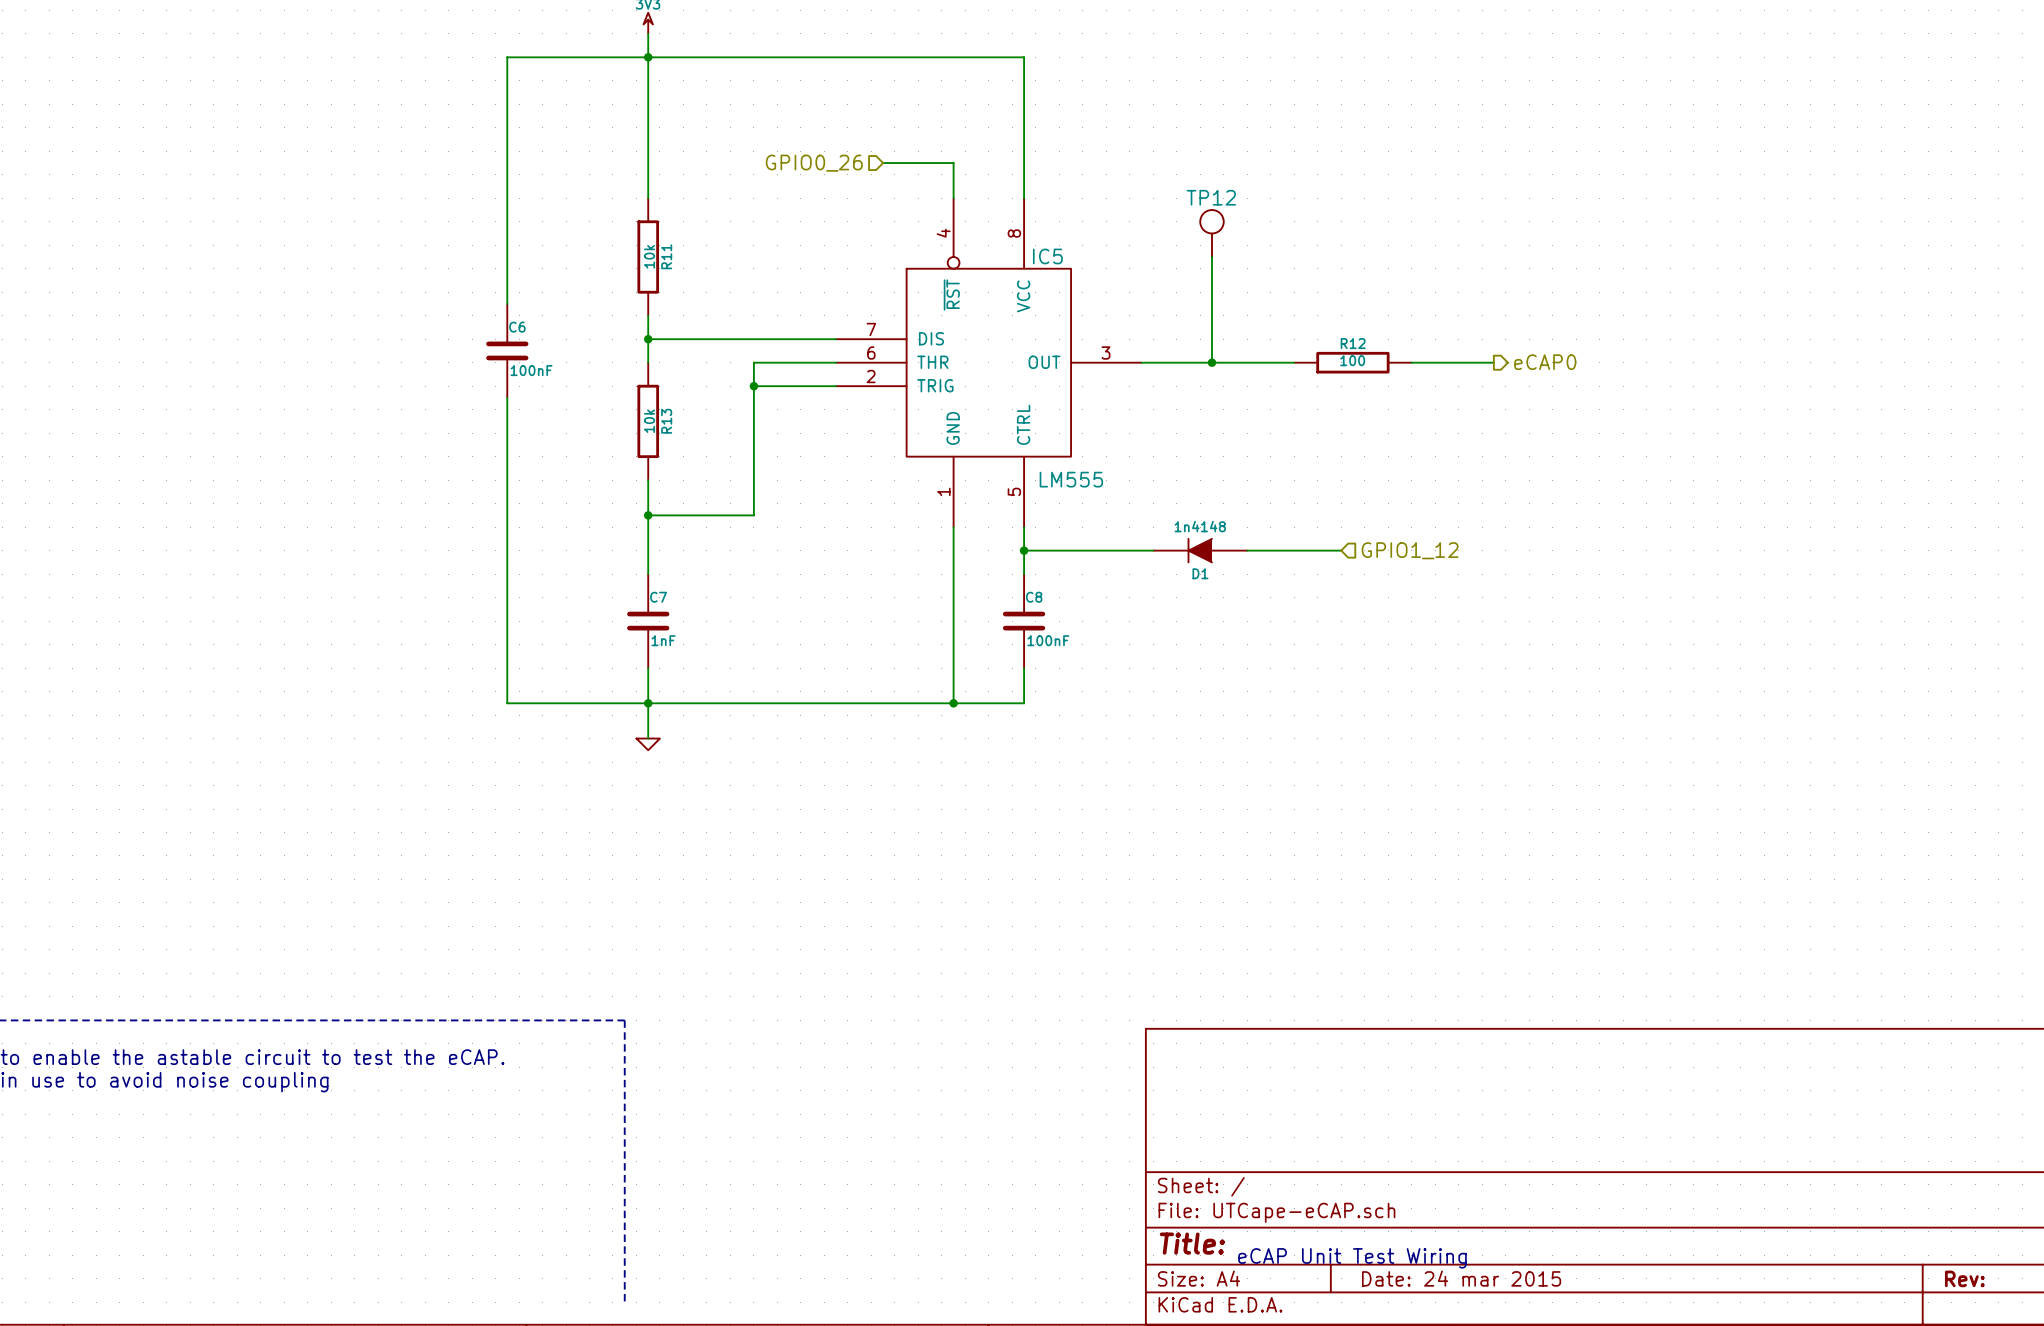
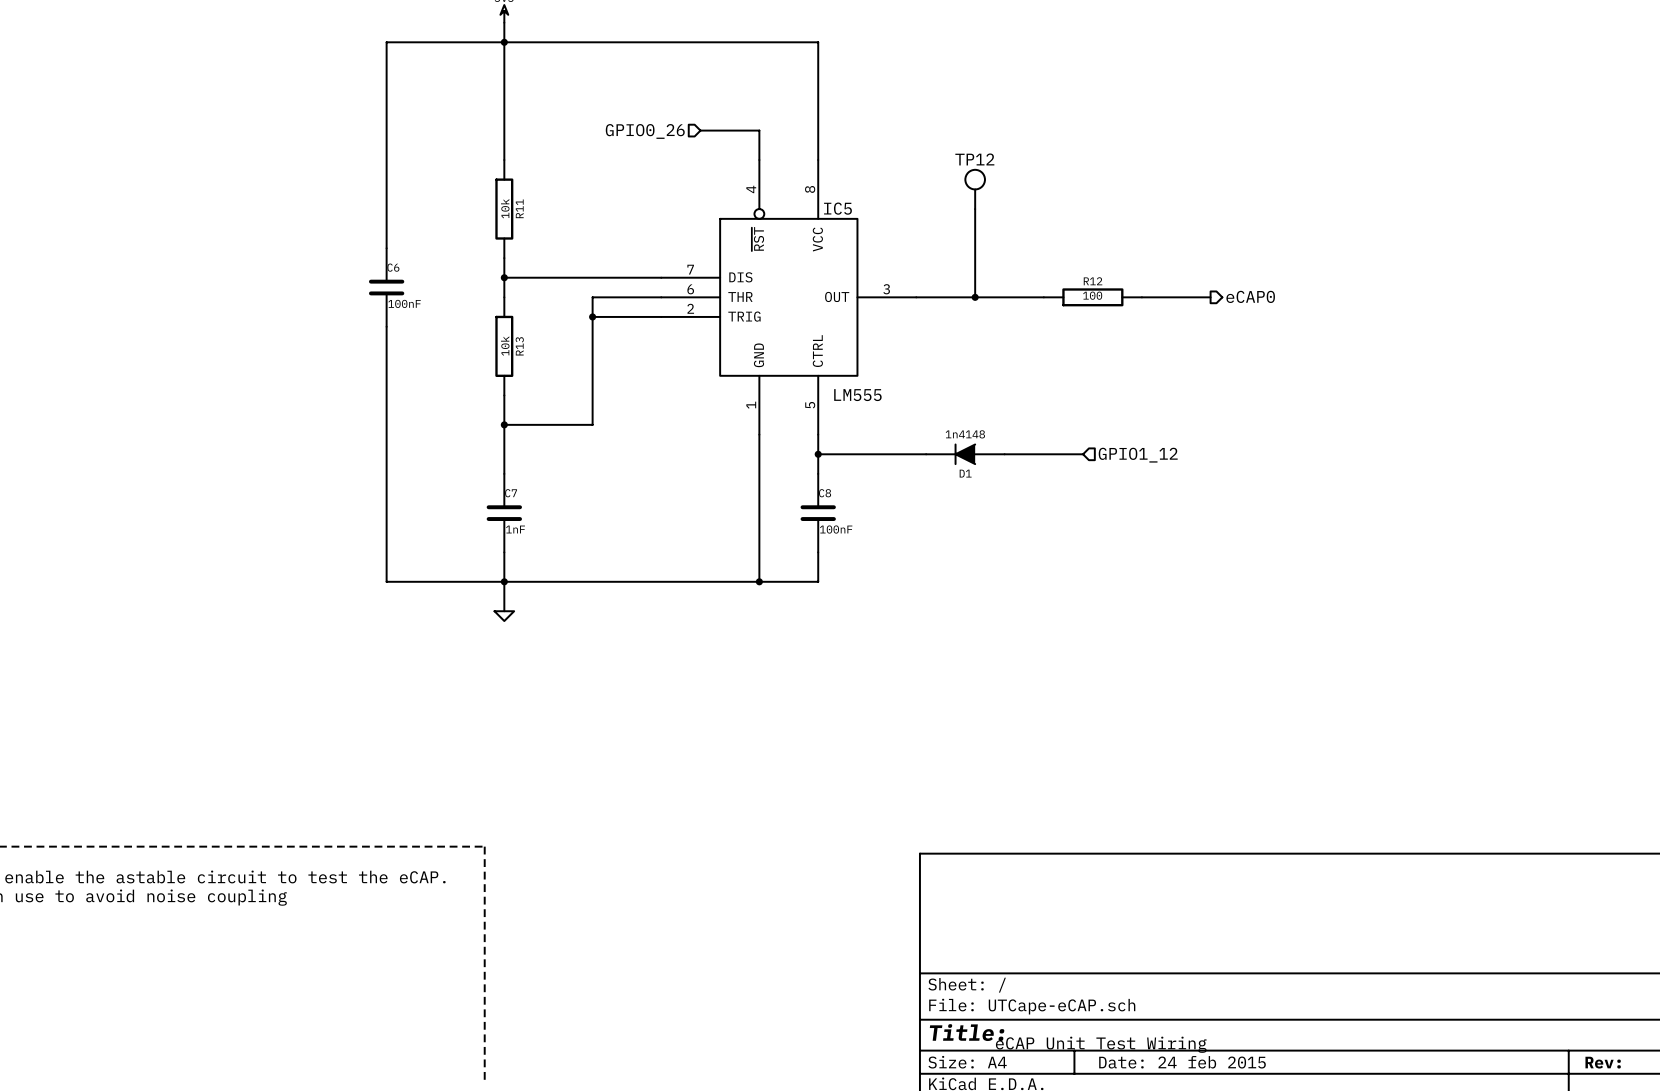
title block: Date: 24 mar 2015 (1461, 1278) -> Date: 24 feb 2015 (1182, 1062)

